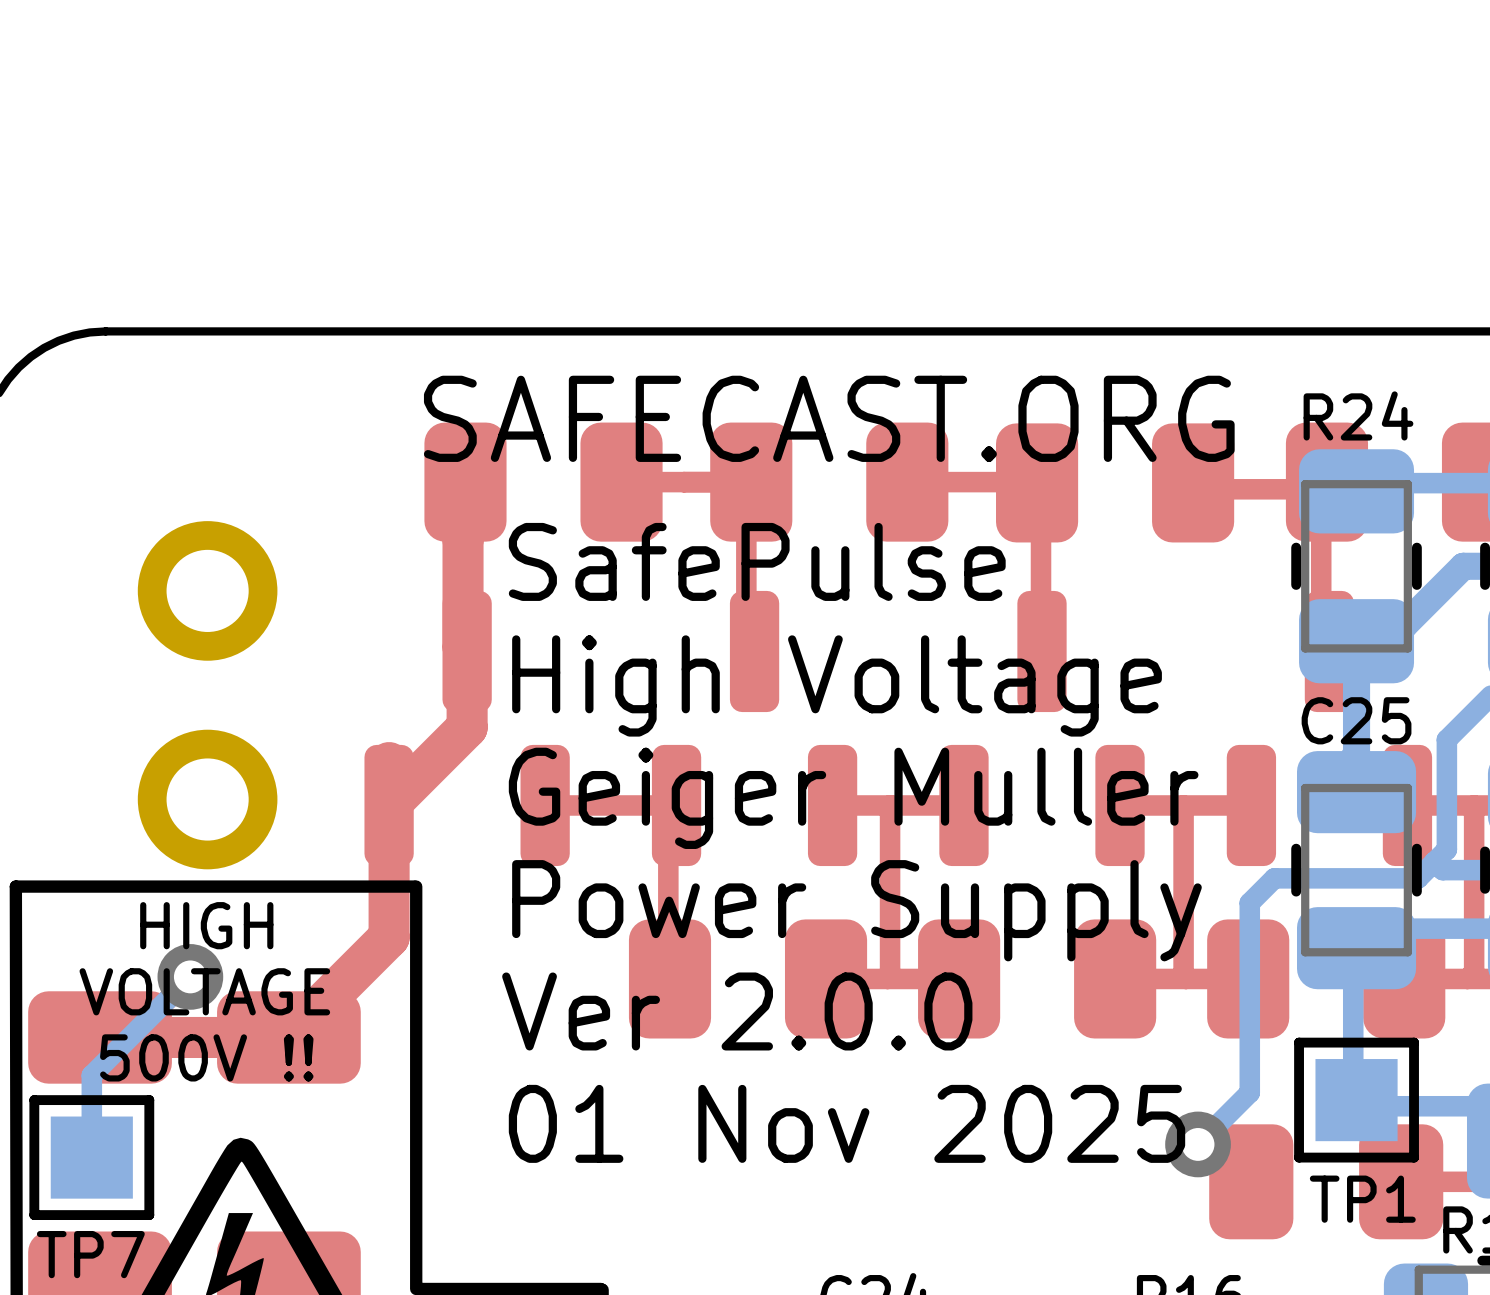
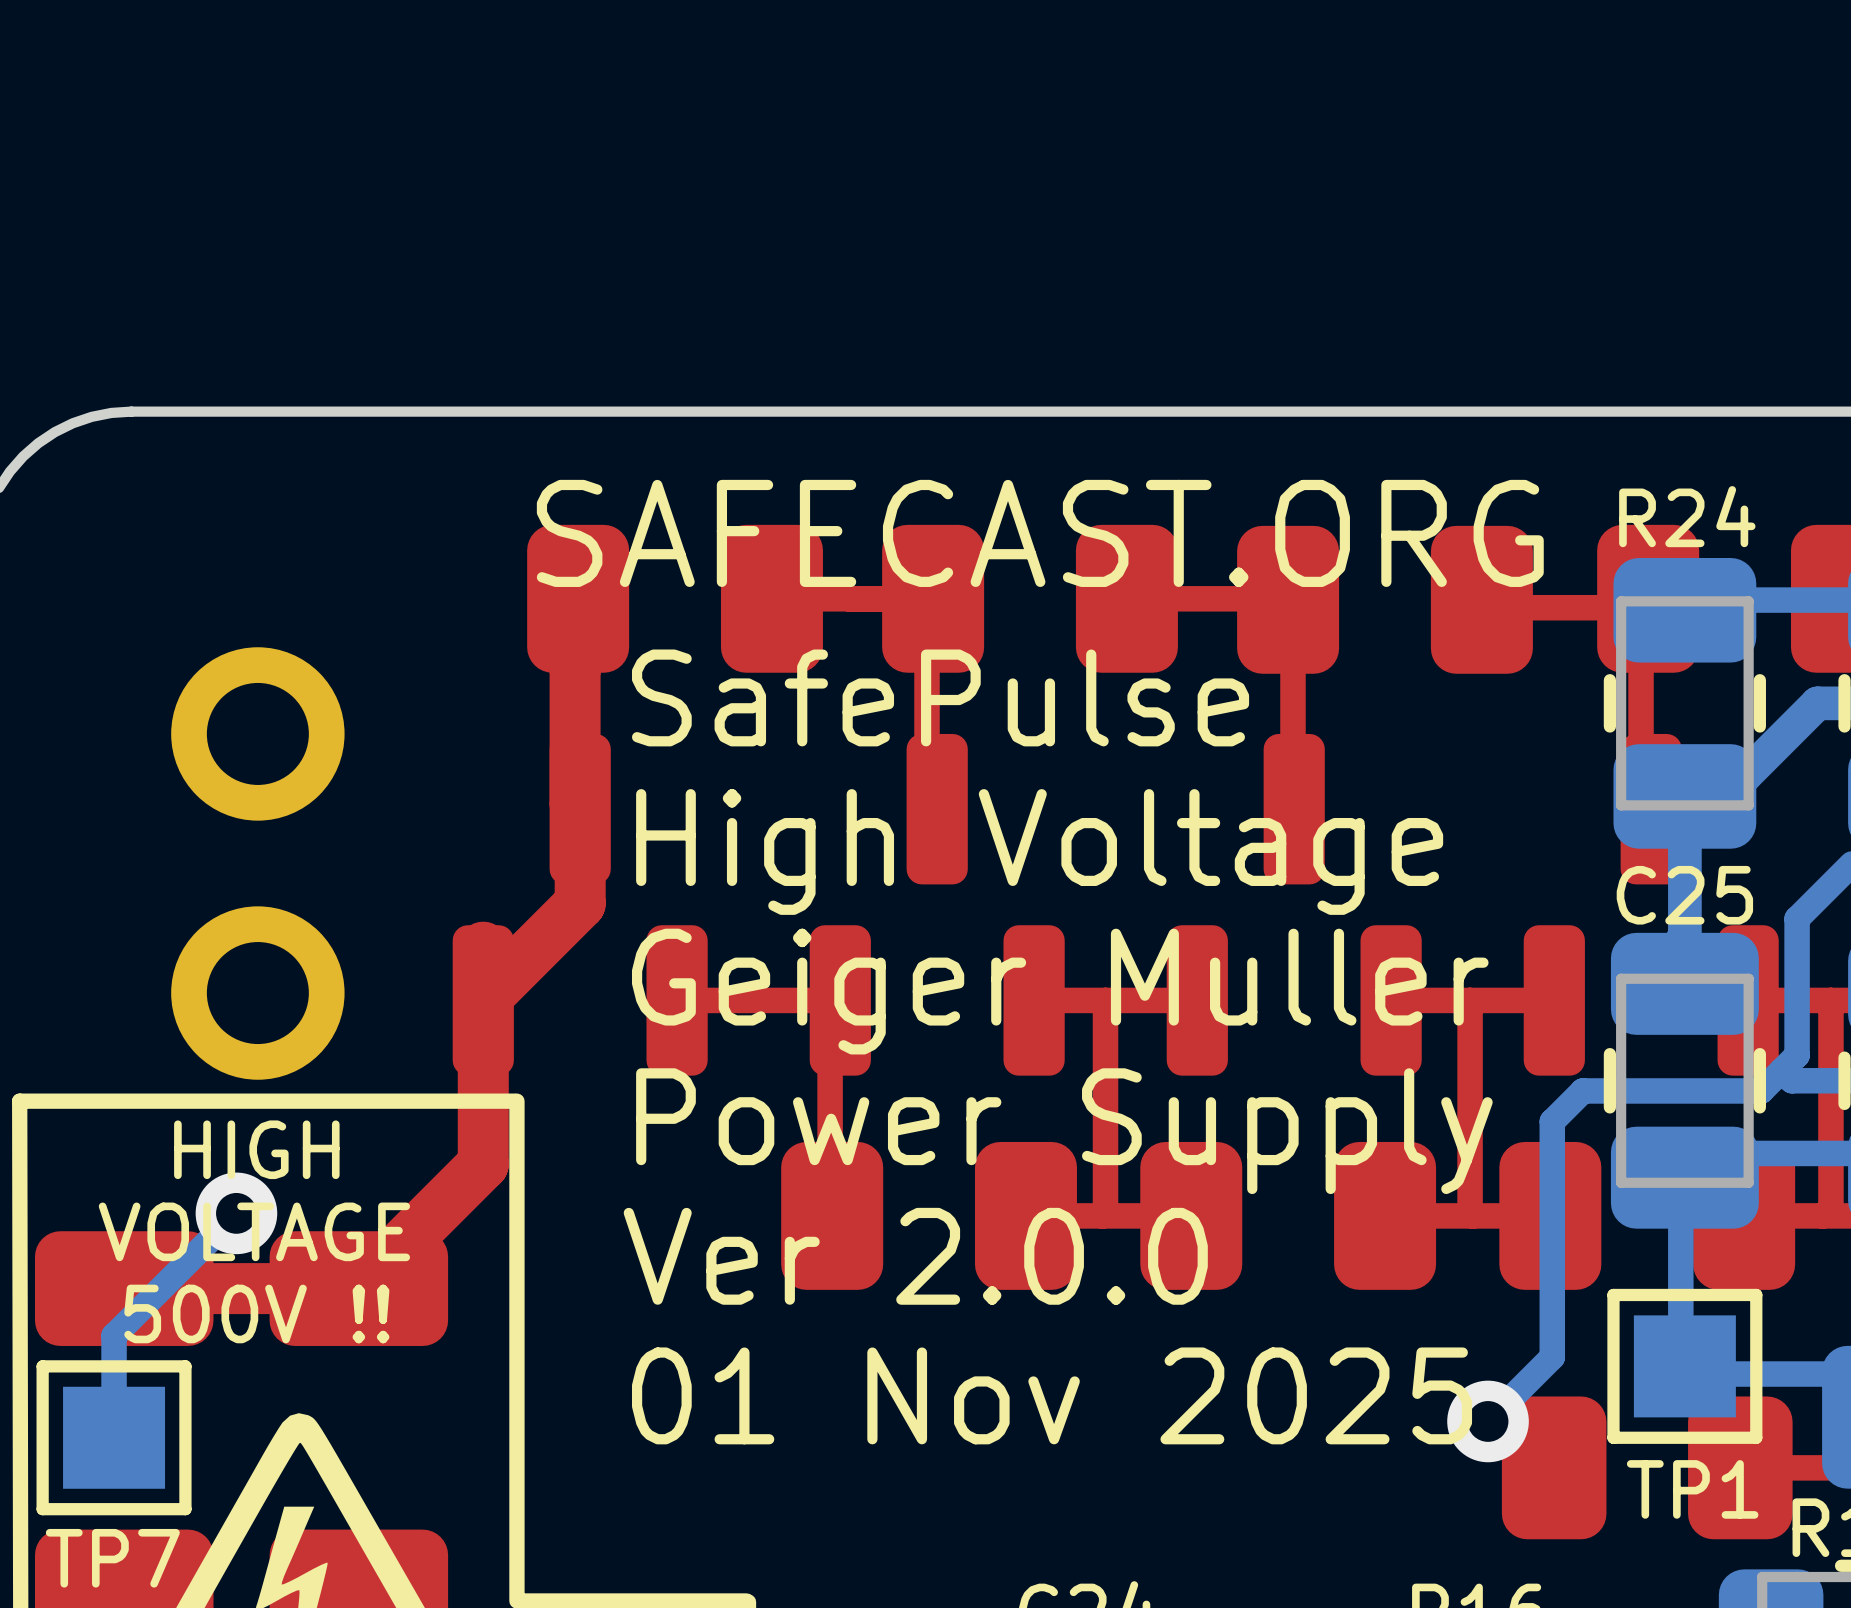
text position: SAFECAST.ORG (829, 418) -> SAFECAST.ORG (1040, 533)

